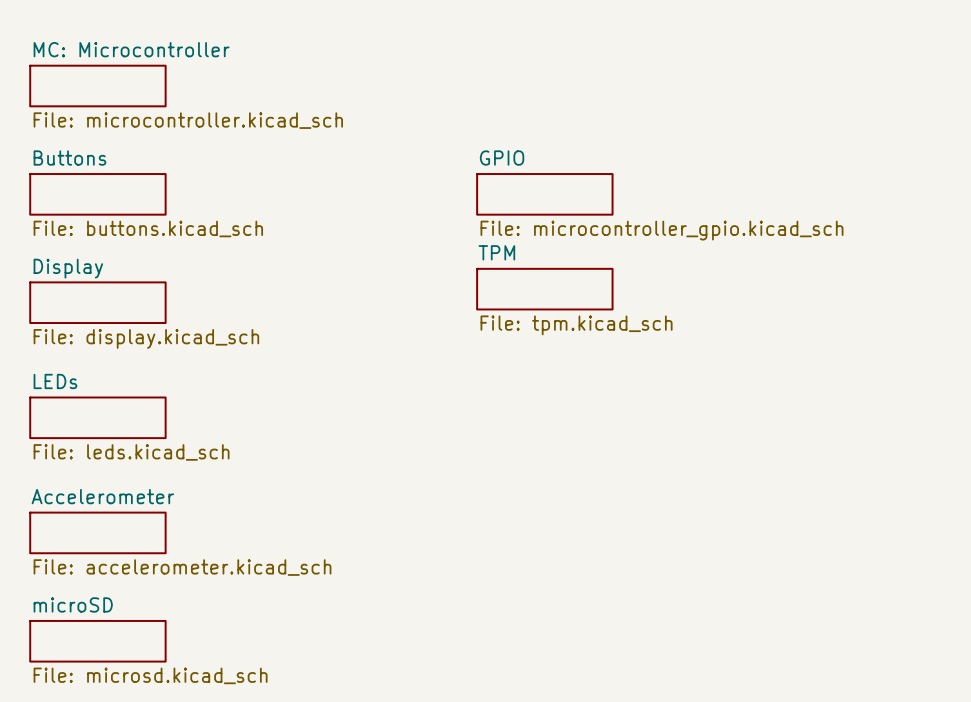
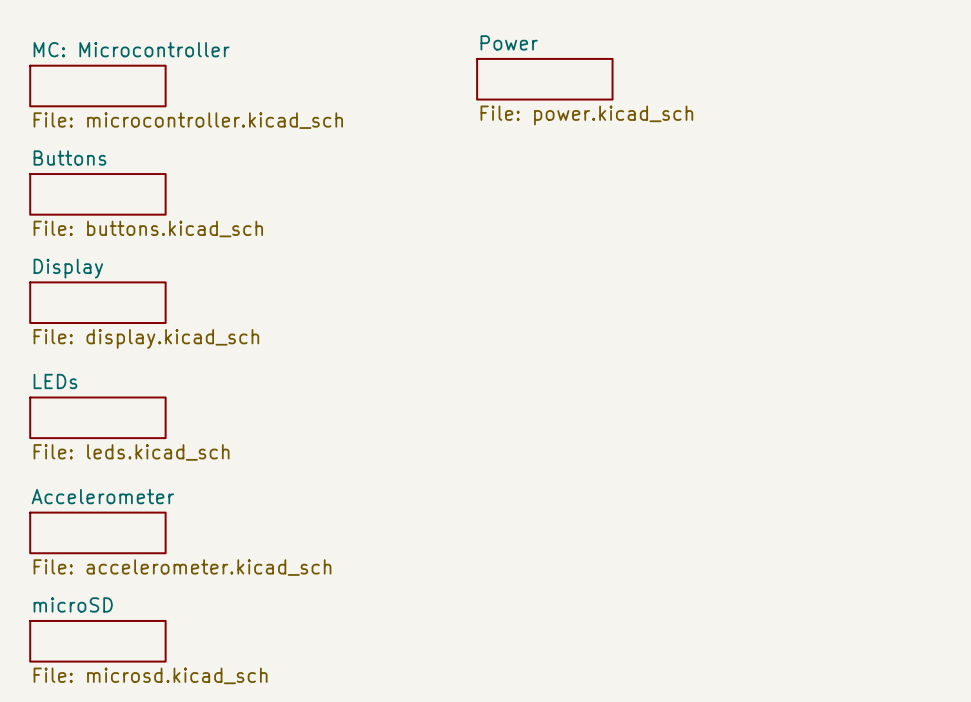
sheet Power: none -> File: power.kicad_sch (544, 79)
sheet GPIO: File: microcontroller_gpio.kicad_sch (544, 194) -> none
sheet TPM: File: tpm.kicad_sch (544, 289) -> none

